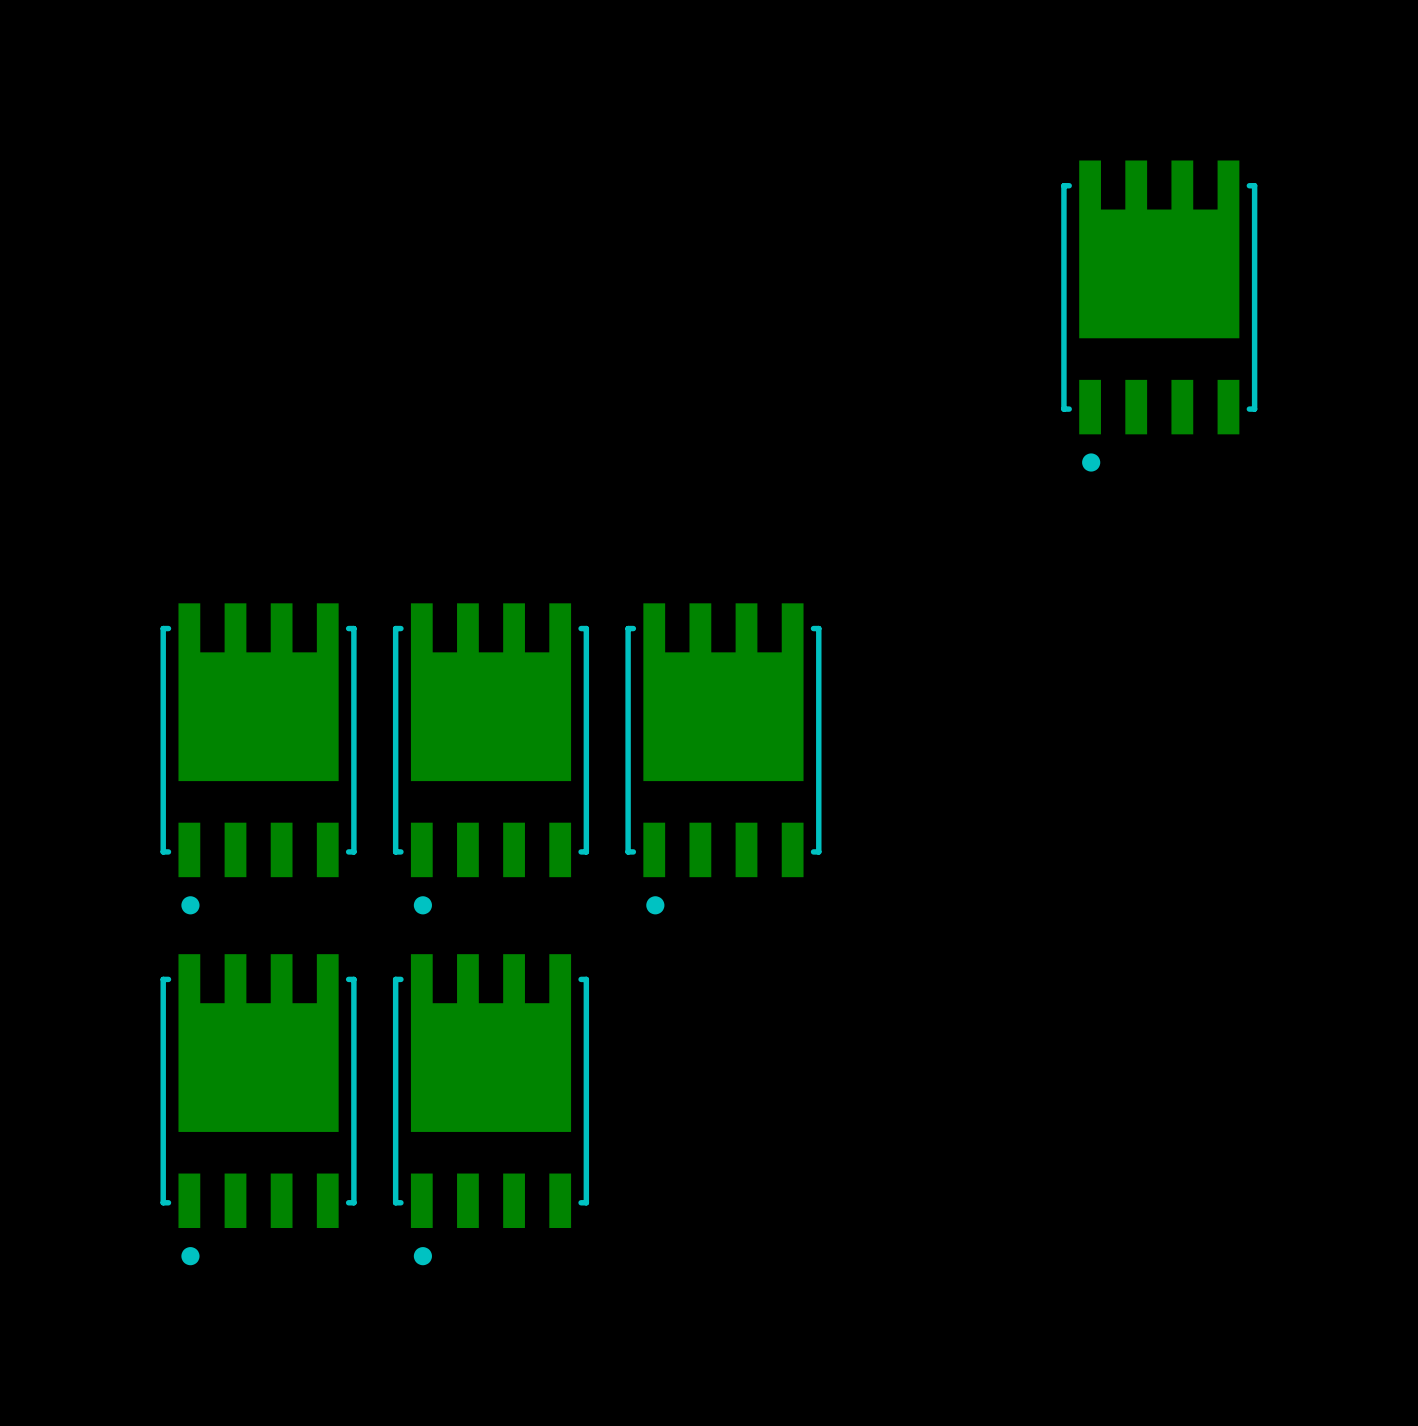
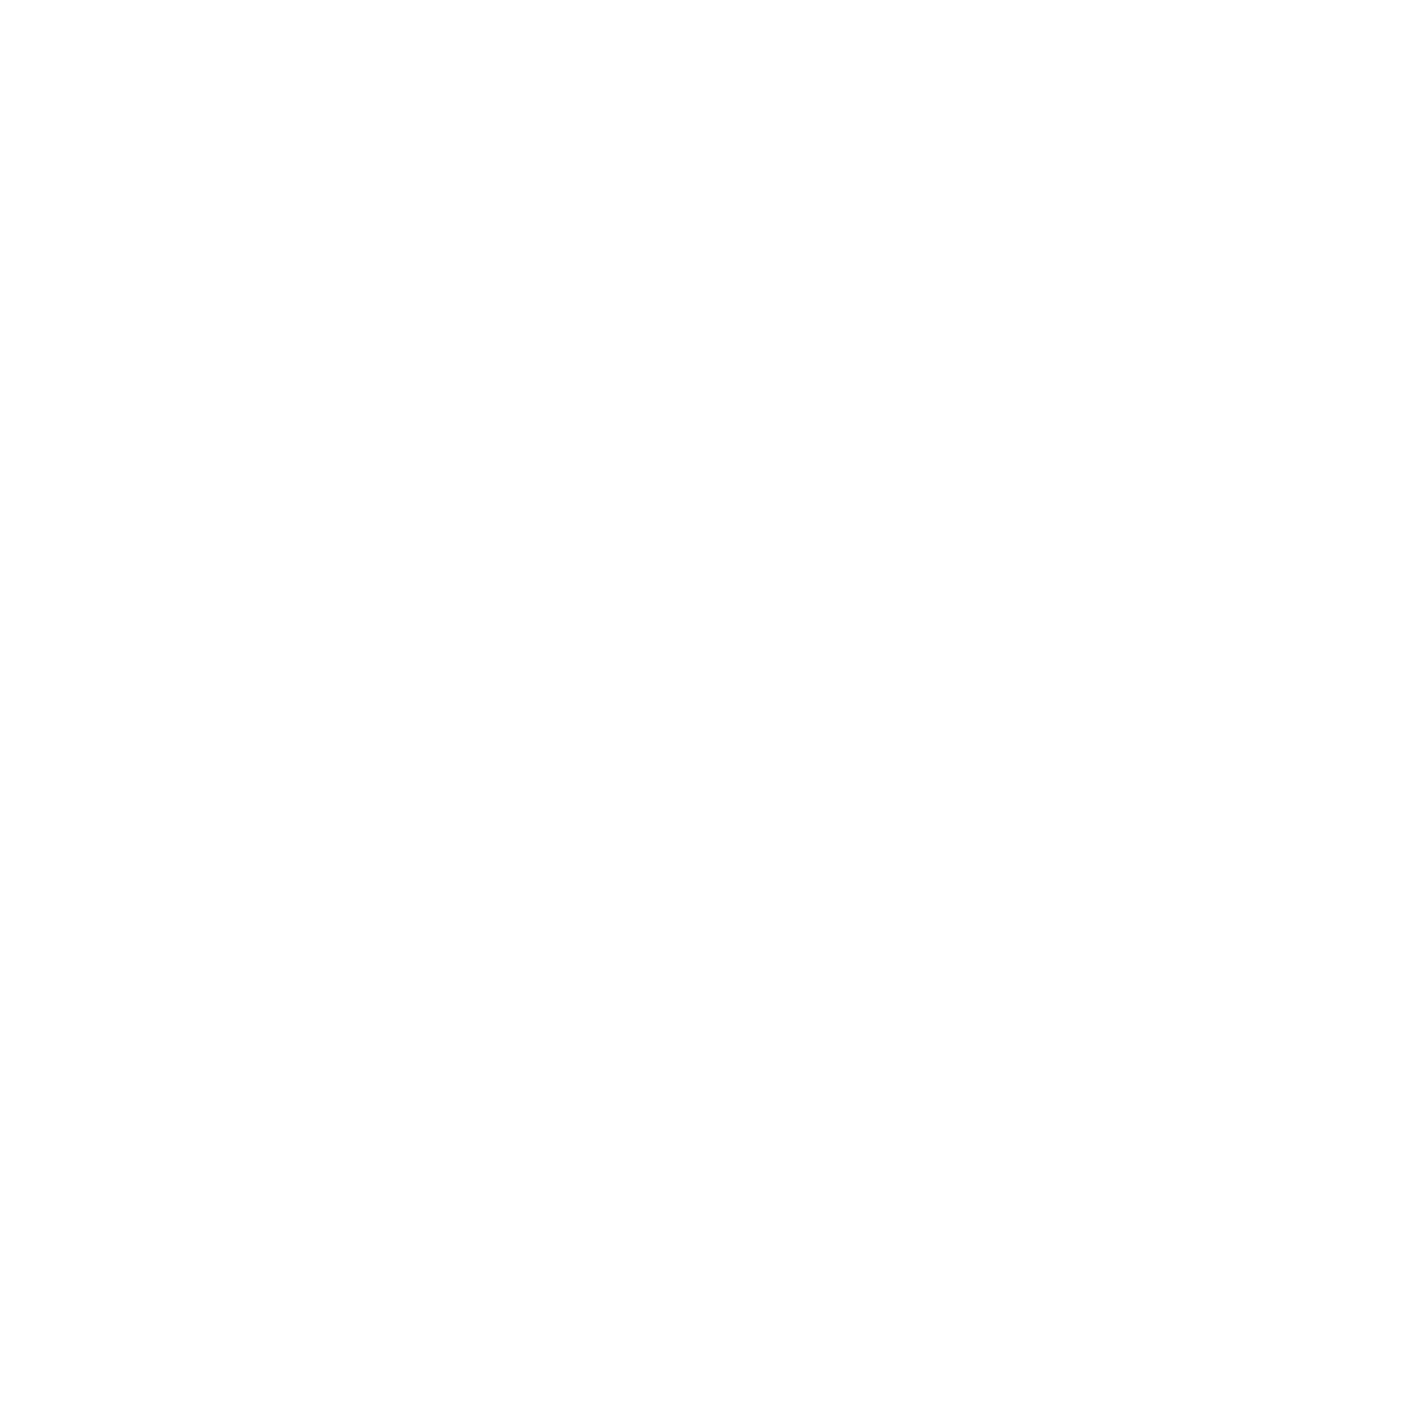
part: (1159, 316) -> none
part: (258, 758) -> none
part: (491, 758) -> none
part: (723, 758) -> none
part: (258, 1109) -> none
part: (491, 1109) -> none

